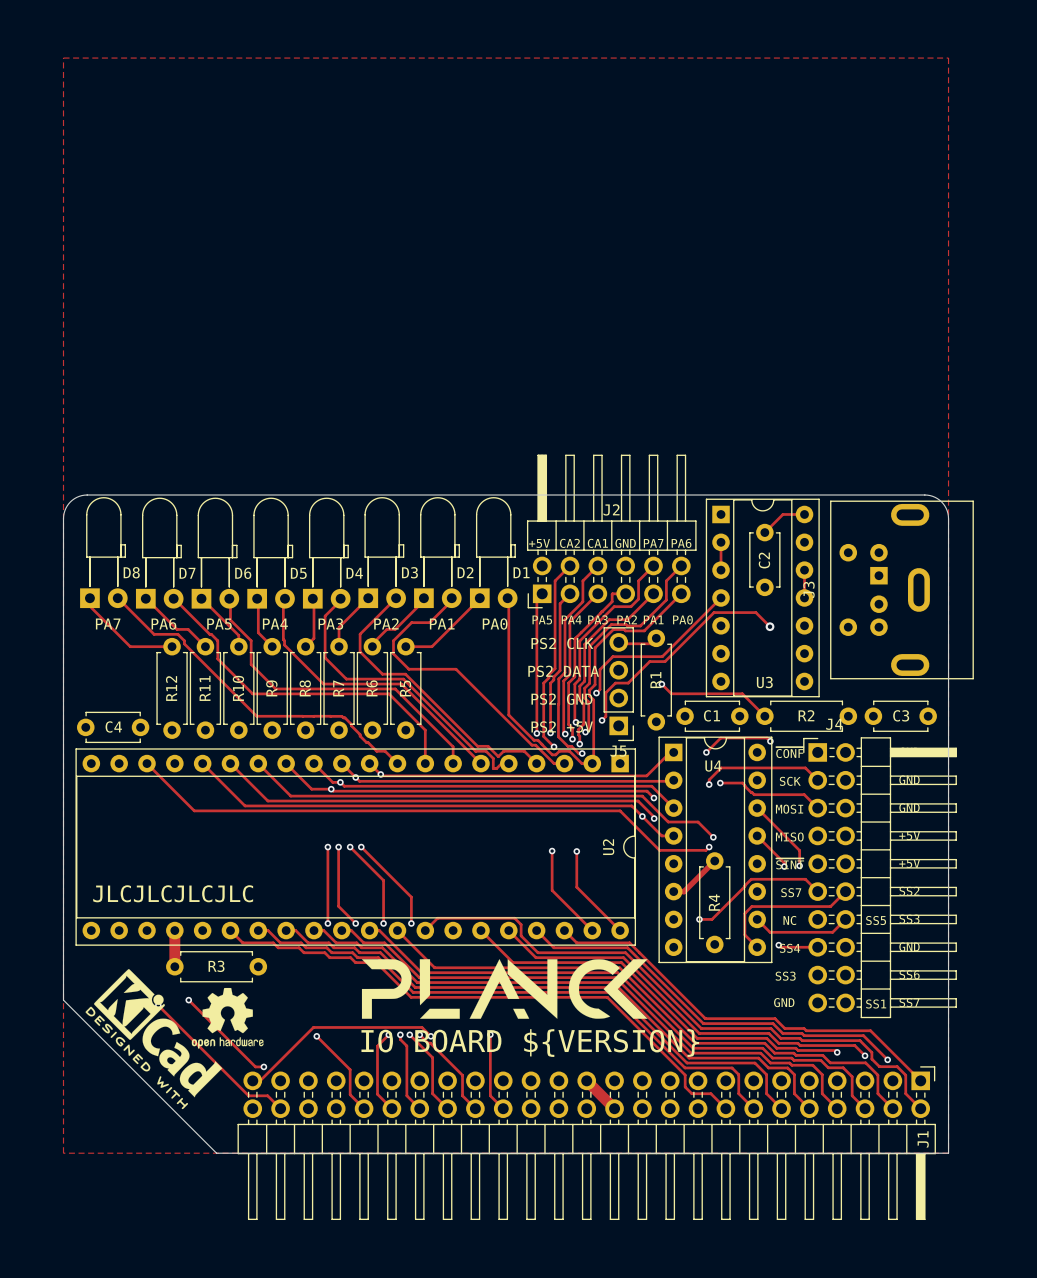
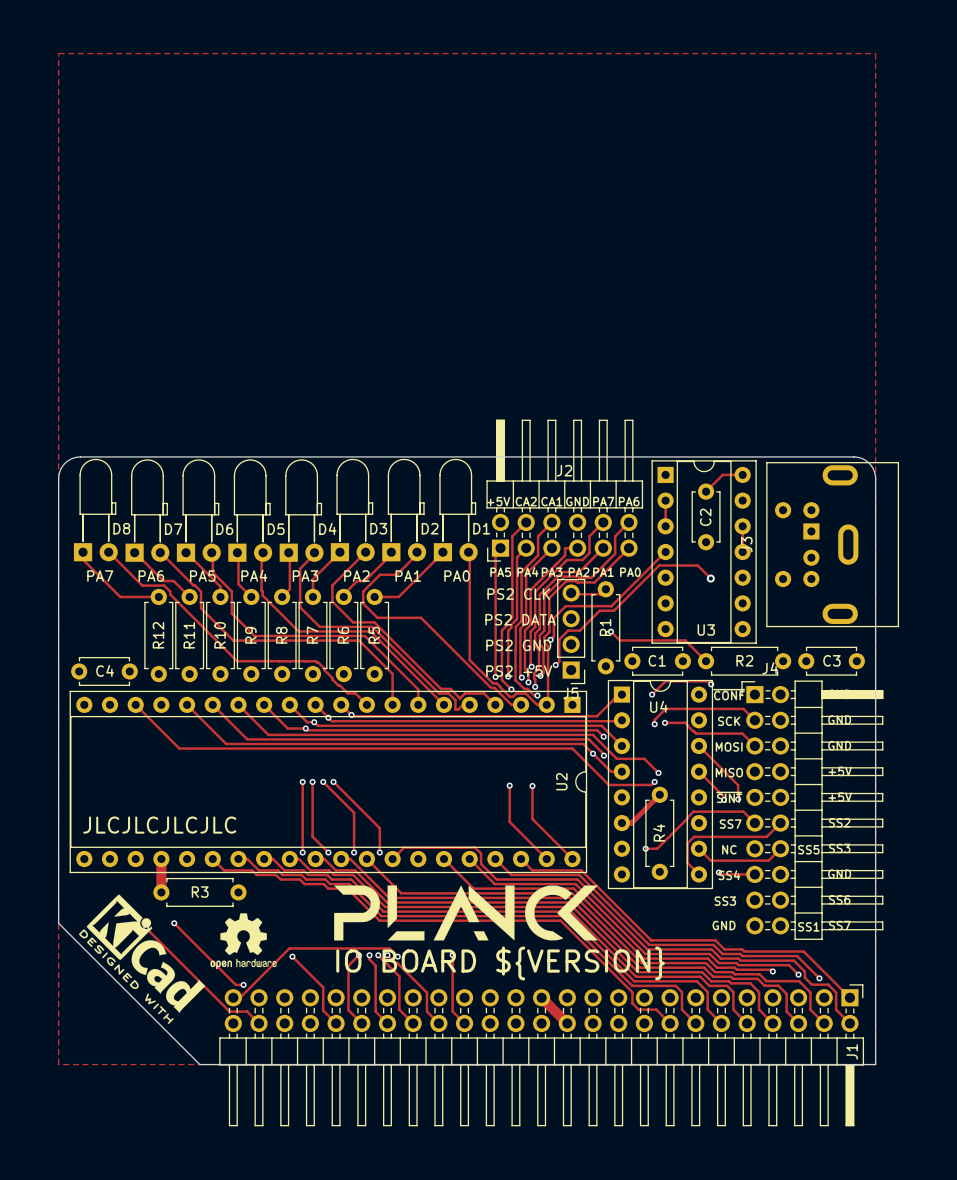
drawing position: (227, 1018) -> (243, 941)

